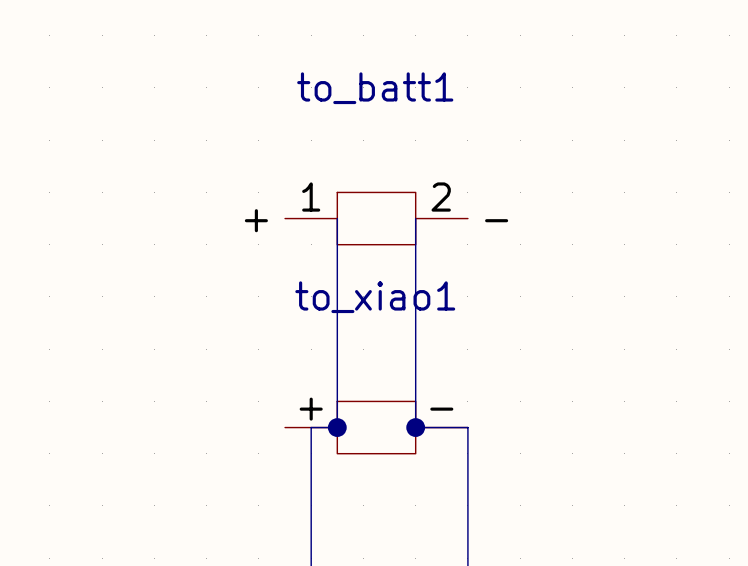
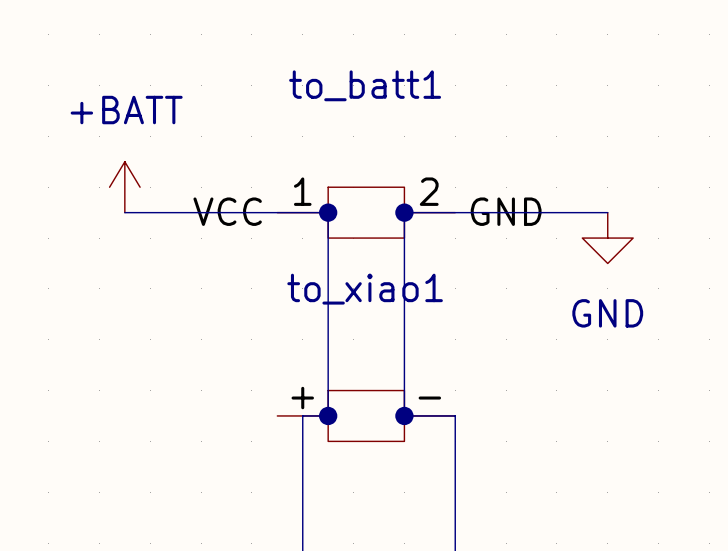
power symbol: none -> +BATT (124, 187)
wire: none -> (124, 212) (328, 212)
junction: none -> (328, 212)
wire: none -> (404, 212) (607, 212)
junction: none -> (404, 212)
to_batt1 pin name: + (256, 220) -> VCC (227, 211)
to_batt1 pin name: - (496, 220) -> GND (506, 211)
power symbol: none -> GND (607, 238)

